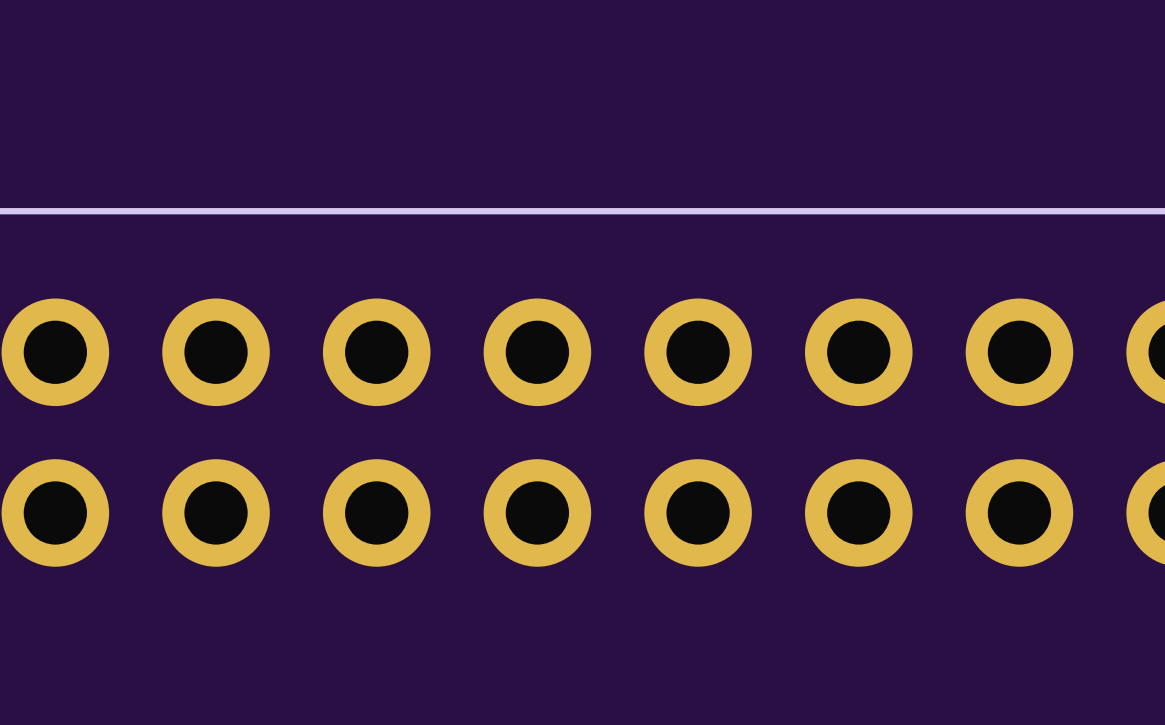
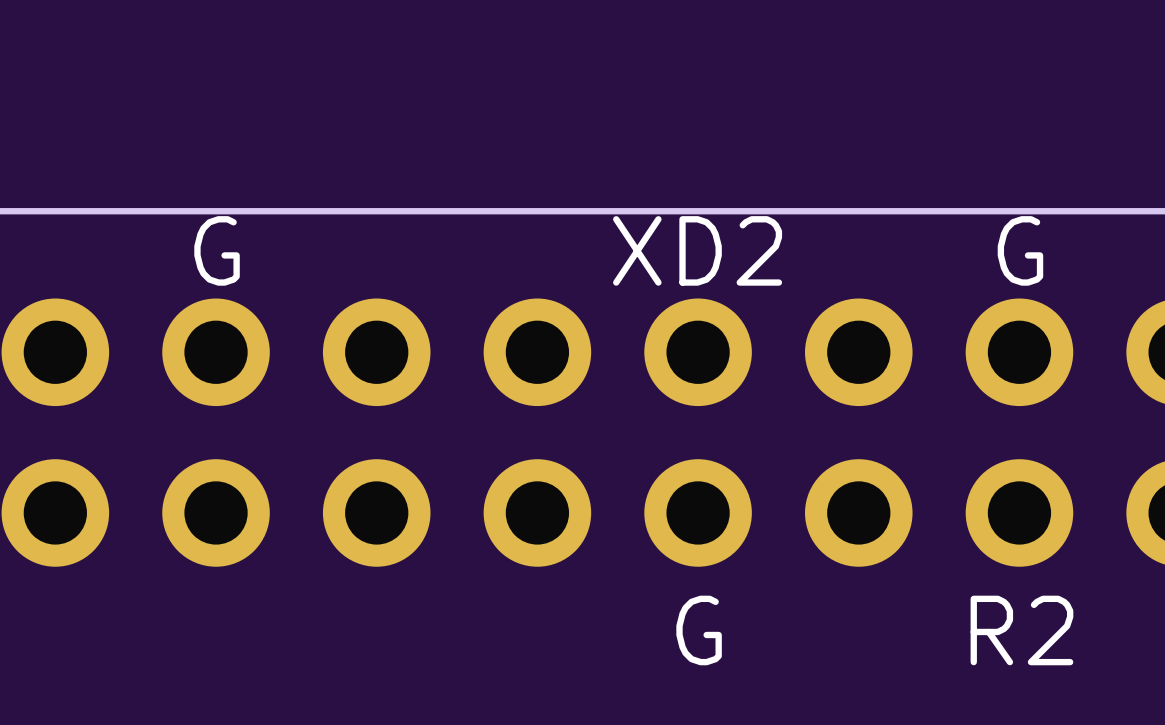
text: none -> G (217, 250)
text: none -> XD2 (697, 250)
text: none -> G (1020, 250)
text: none -> G (699, 630)
text: none -> R2 (1021, 630)

